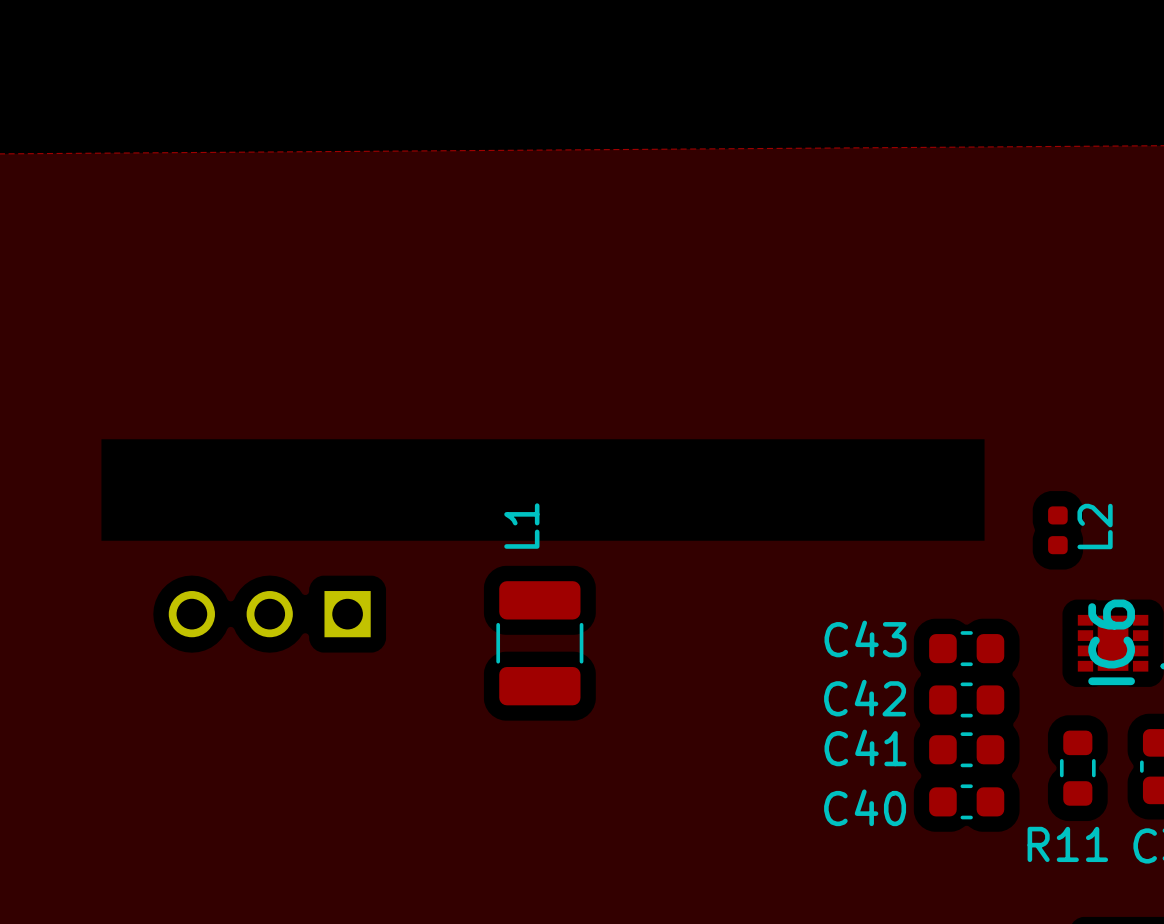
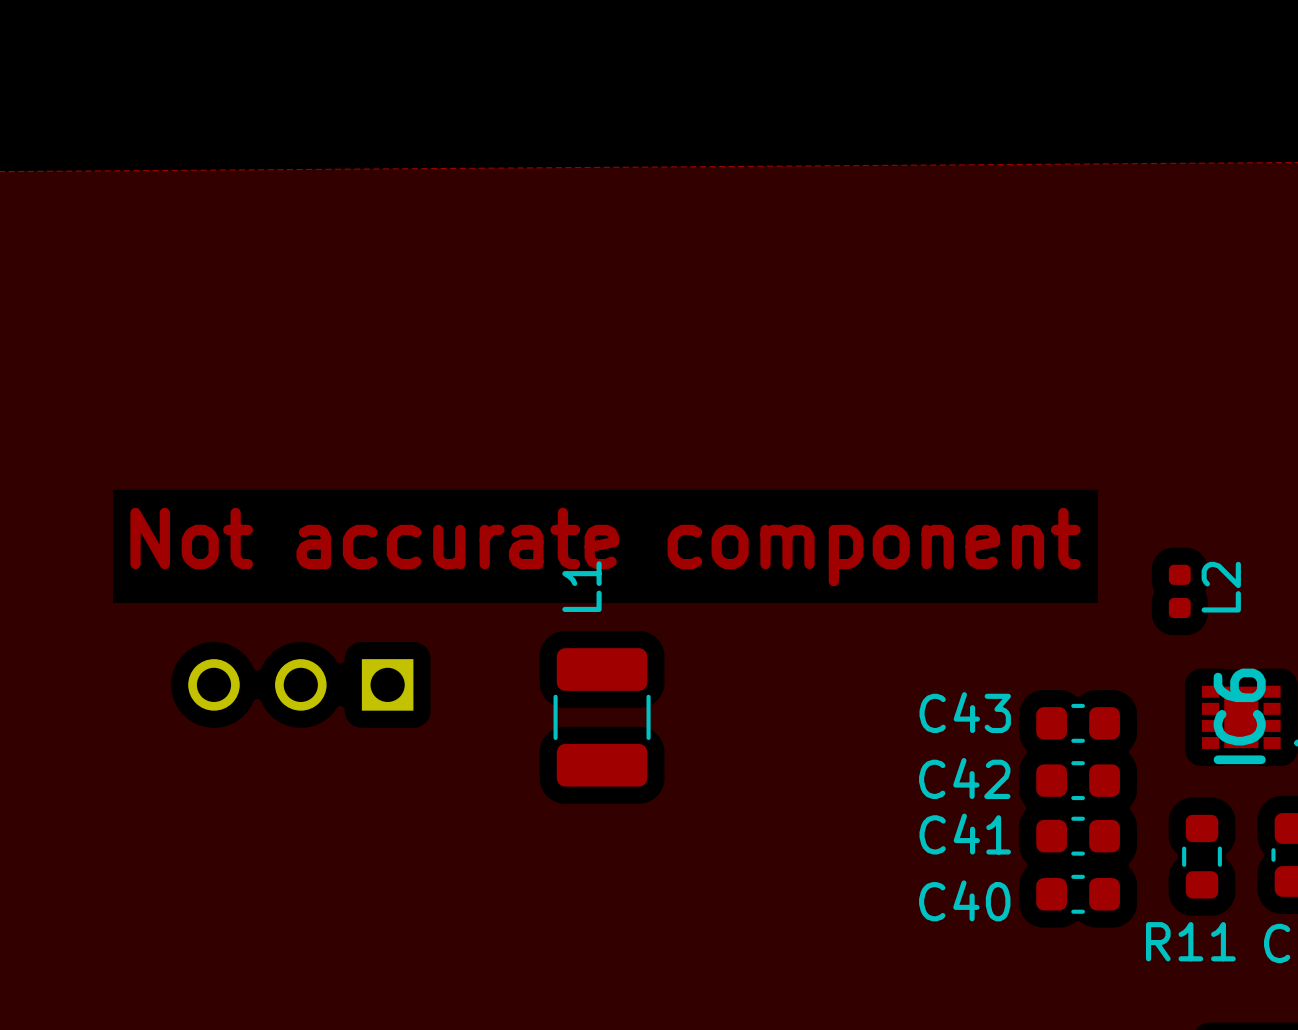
text: none -> Not accurate component (605, 547)

